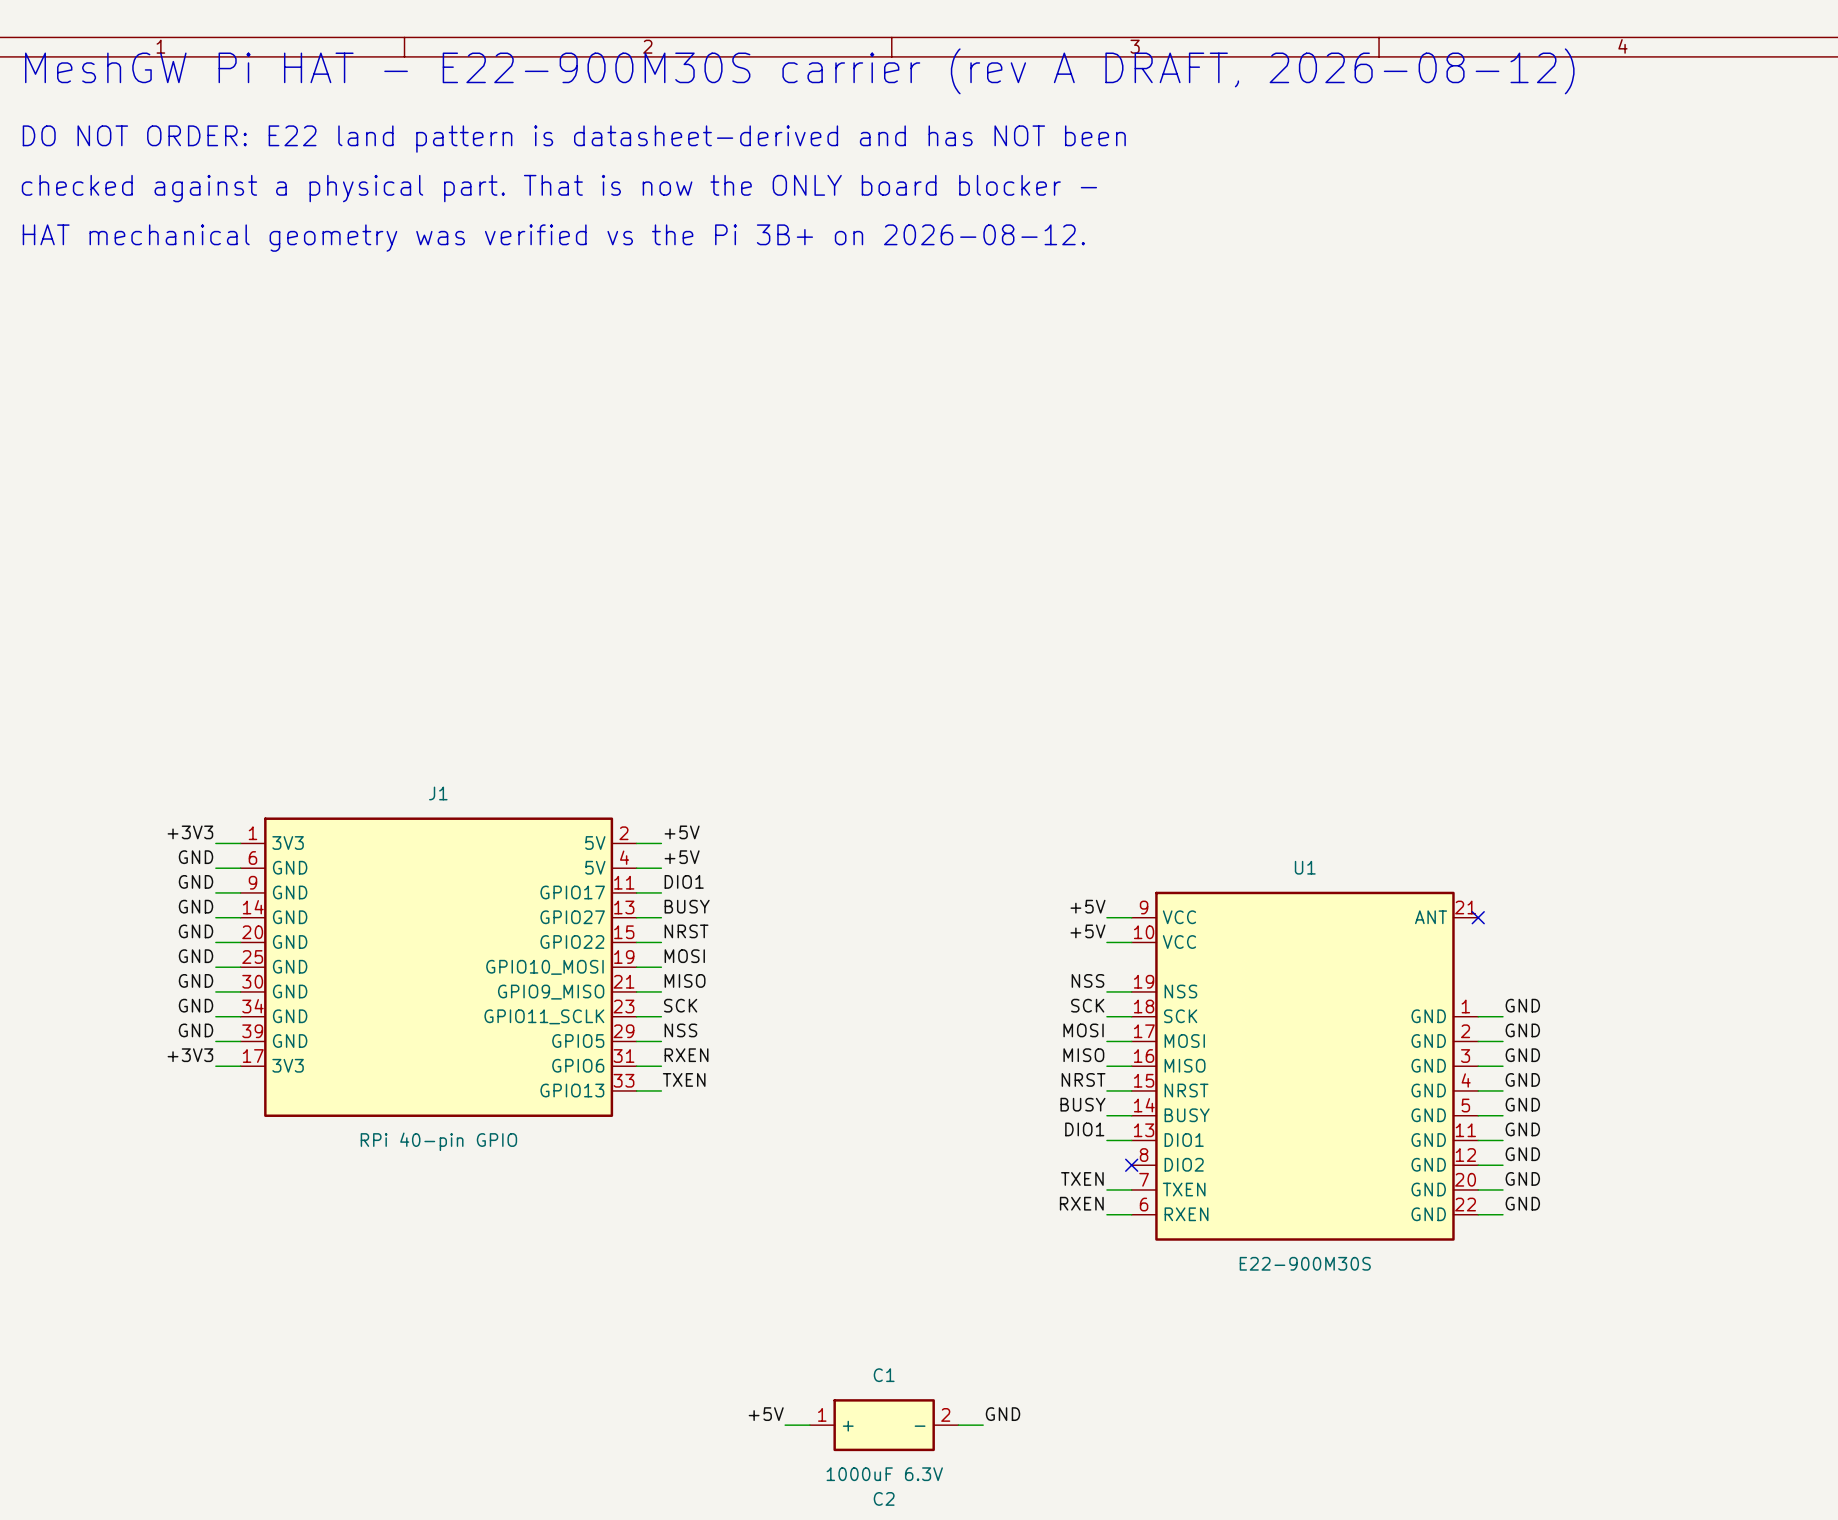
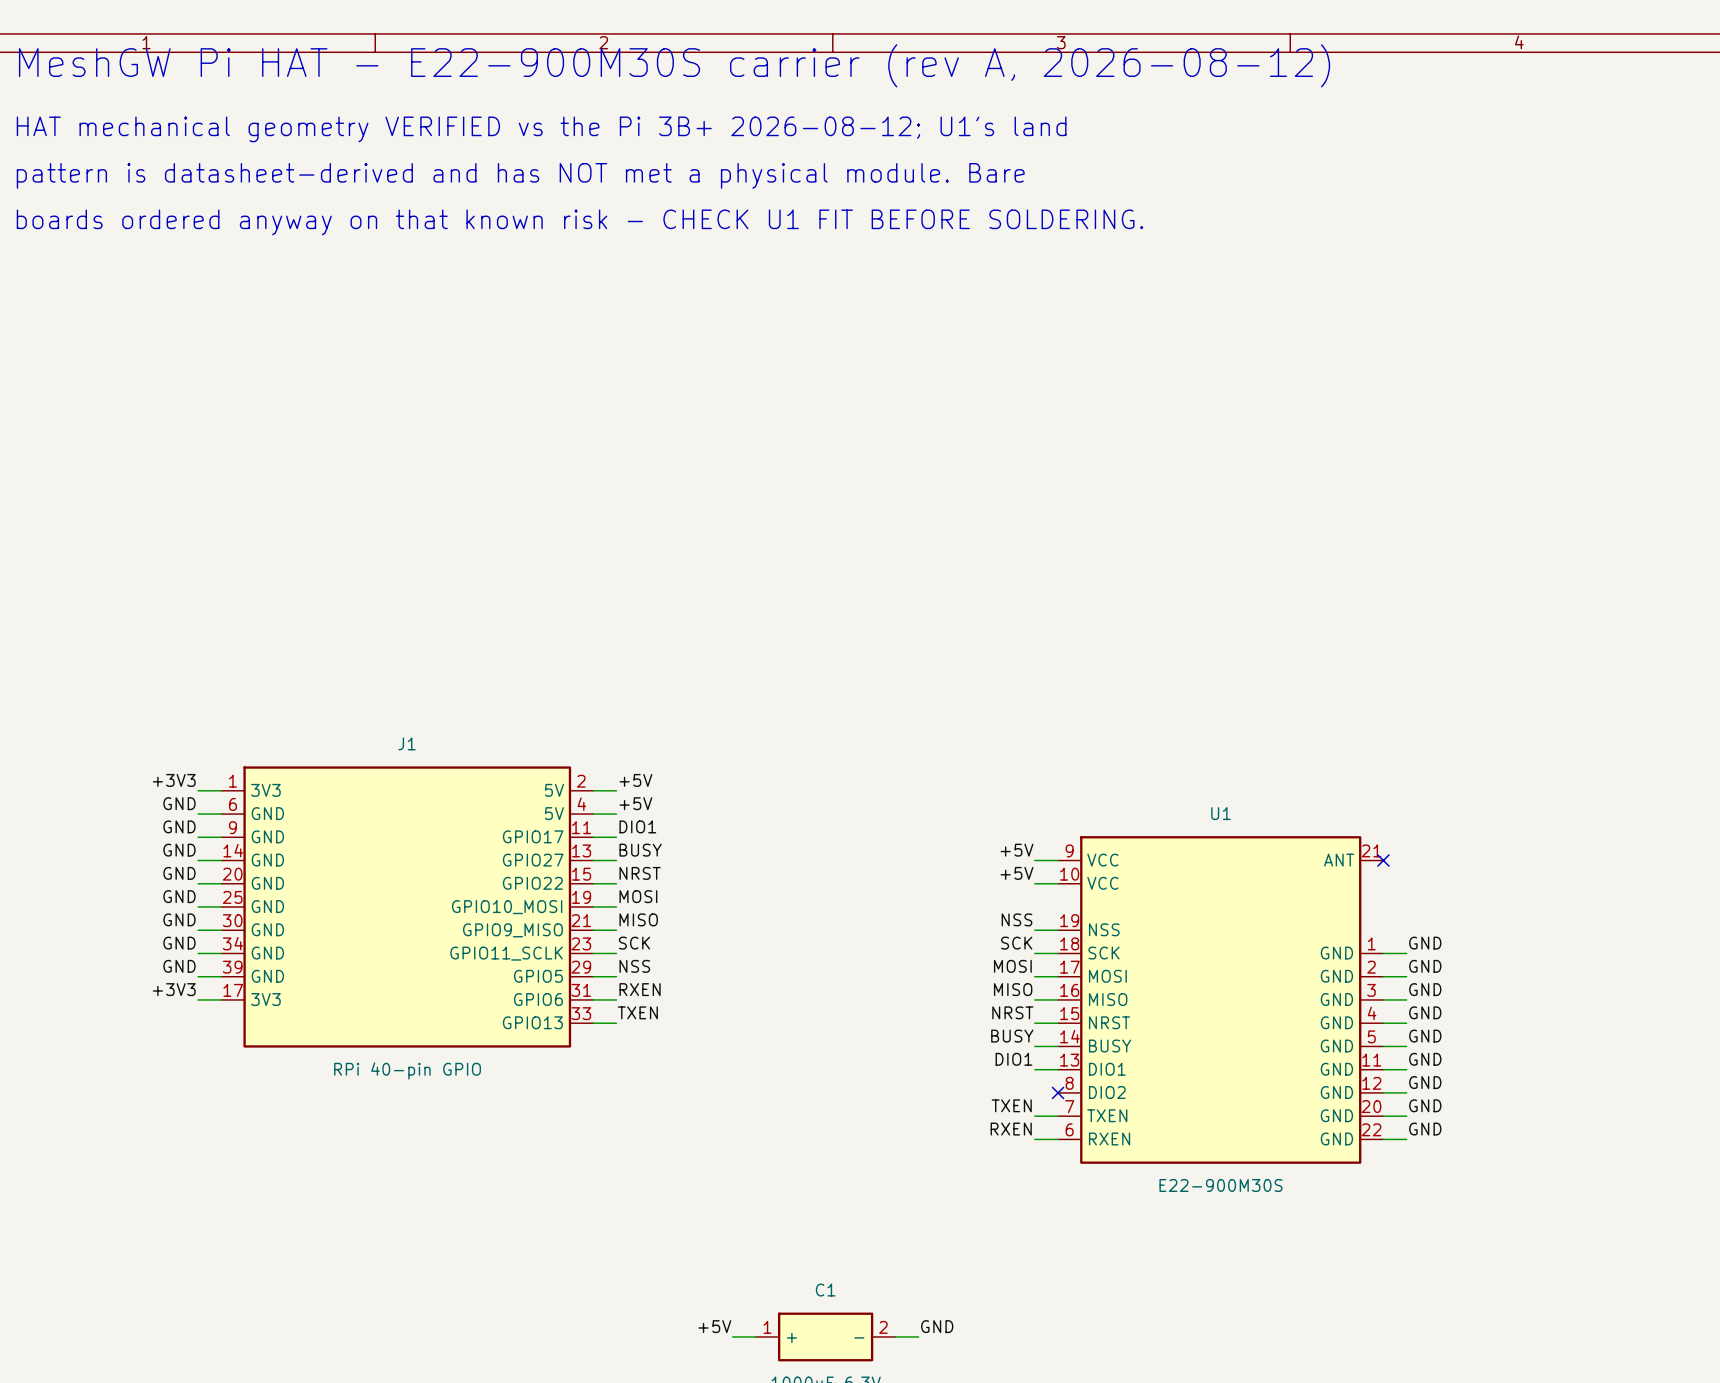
text: MeshGW Pi HAT - E22-900M30S carrier (rev A DRAFT, 2026-08-12) (799, 71) -> MeshGW Pi HAT - E22-900M30S carrier (rev A, 2026-08-12) (674, 65)
text: DO NOT ORDER: E22 land pattern is datasheet-derived and has NOT been (574, 139) -> HAT mechanical geometry VERIFIED vs the Pi 3B+ 2026-08-12; U1's land (541, 129)
text: checked against a physical part. That is now the ONLY board blocker - (559, 188) -> pattern is datasheet-derived and has NOT met a physical module. Bare (520, 175)
text: HAT mechanical geometry was verified vs the Pi 3B+ on 2026-08-12. (553, 238) -> boards ordered anyway on that known risk - CHECK U1 FIT BEFORE SOLDERING. (579, 222)

